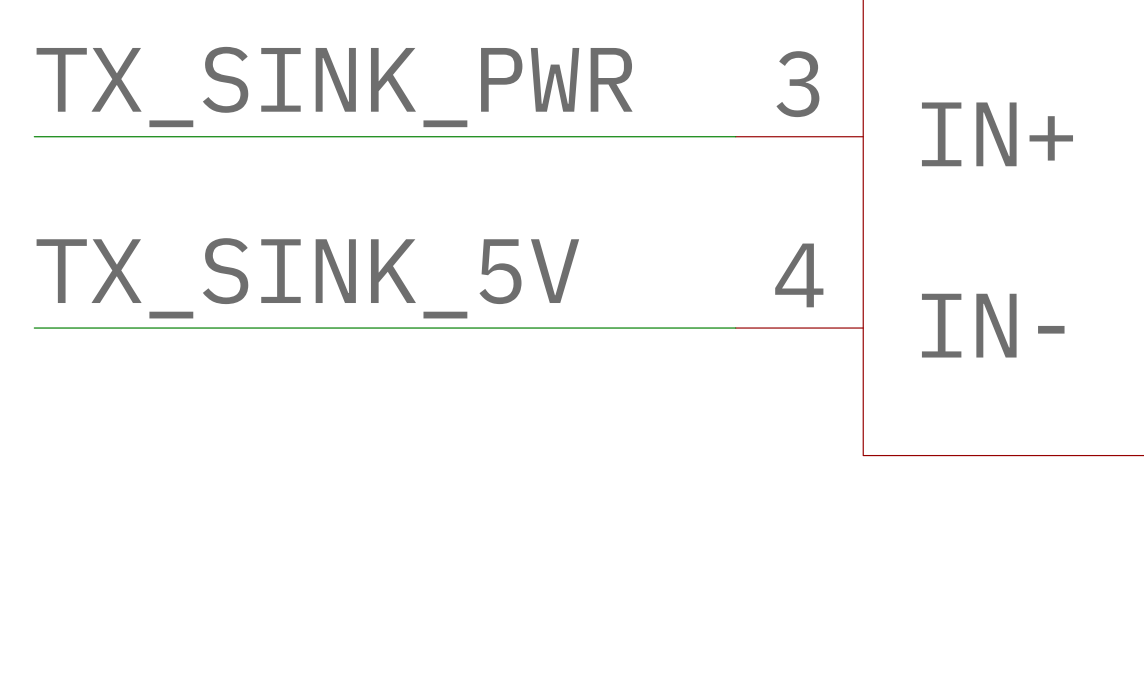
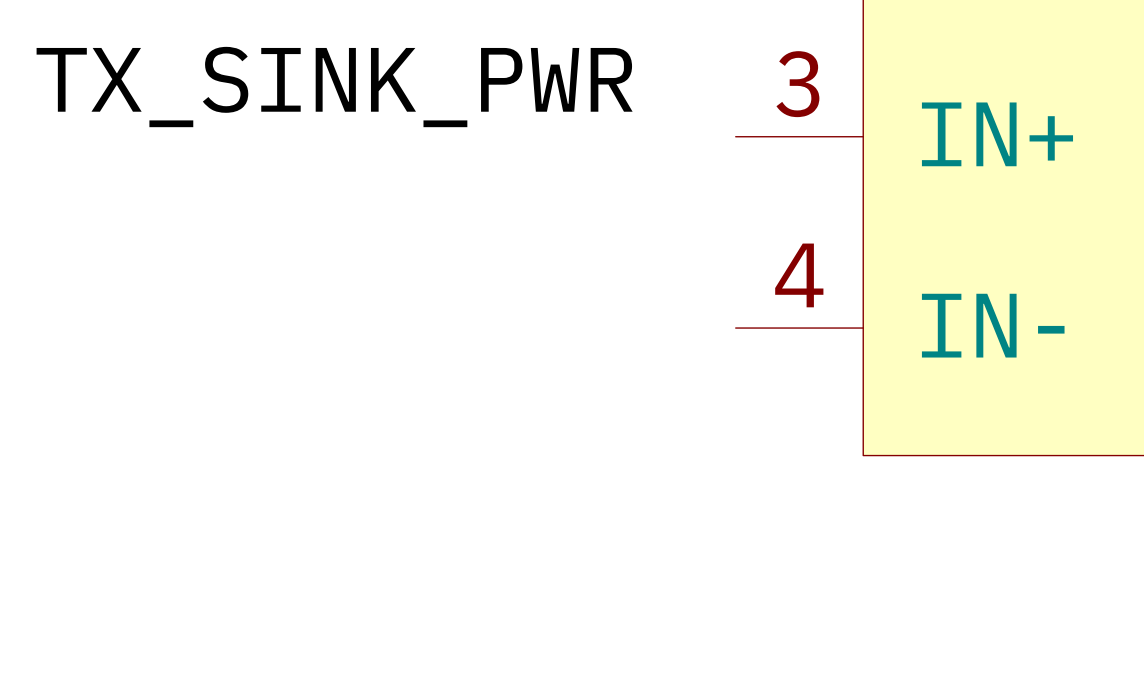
wire: (34, 136) (735, 136) -> none
label: TX_SINK_5V (307, 278) -> none
wire: (34, 328) (735, 328) -> none

